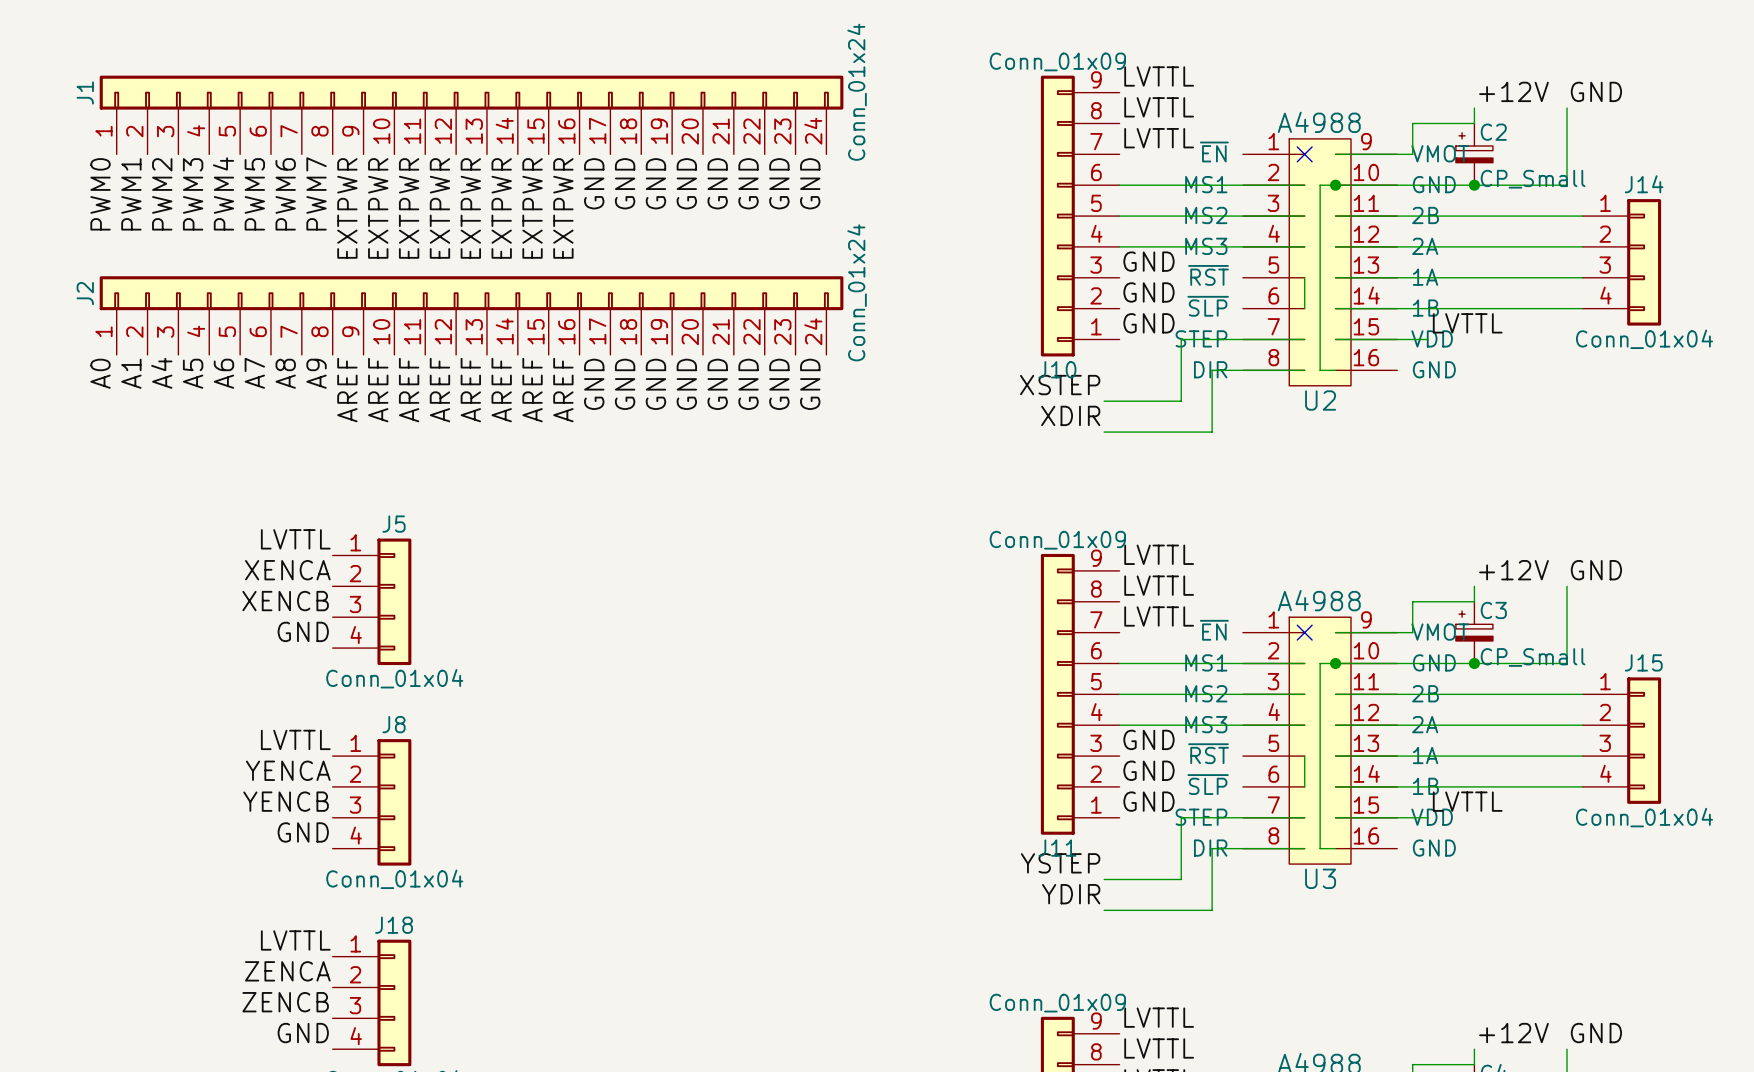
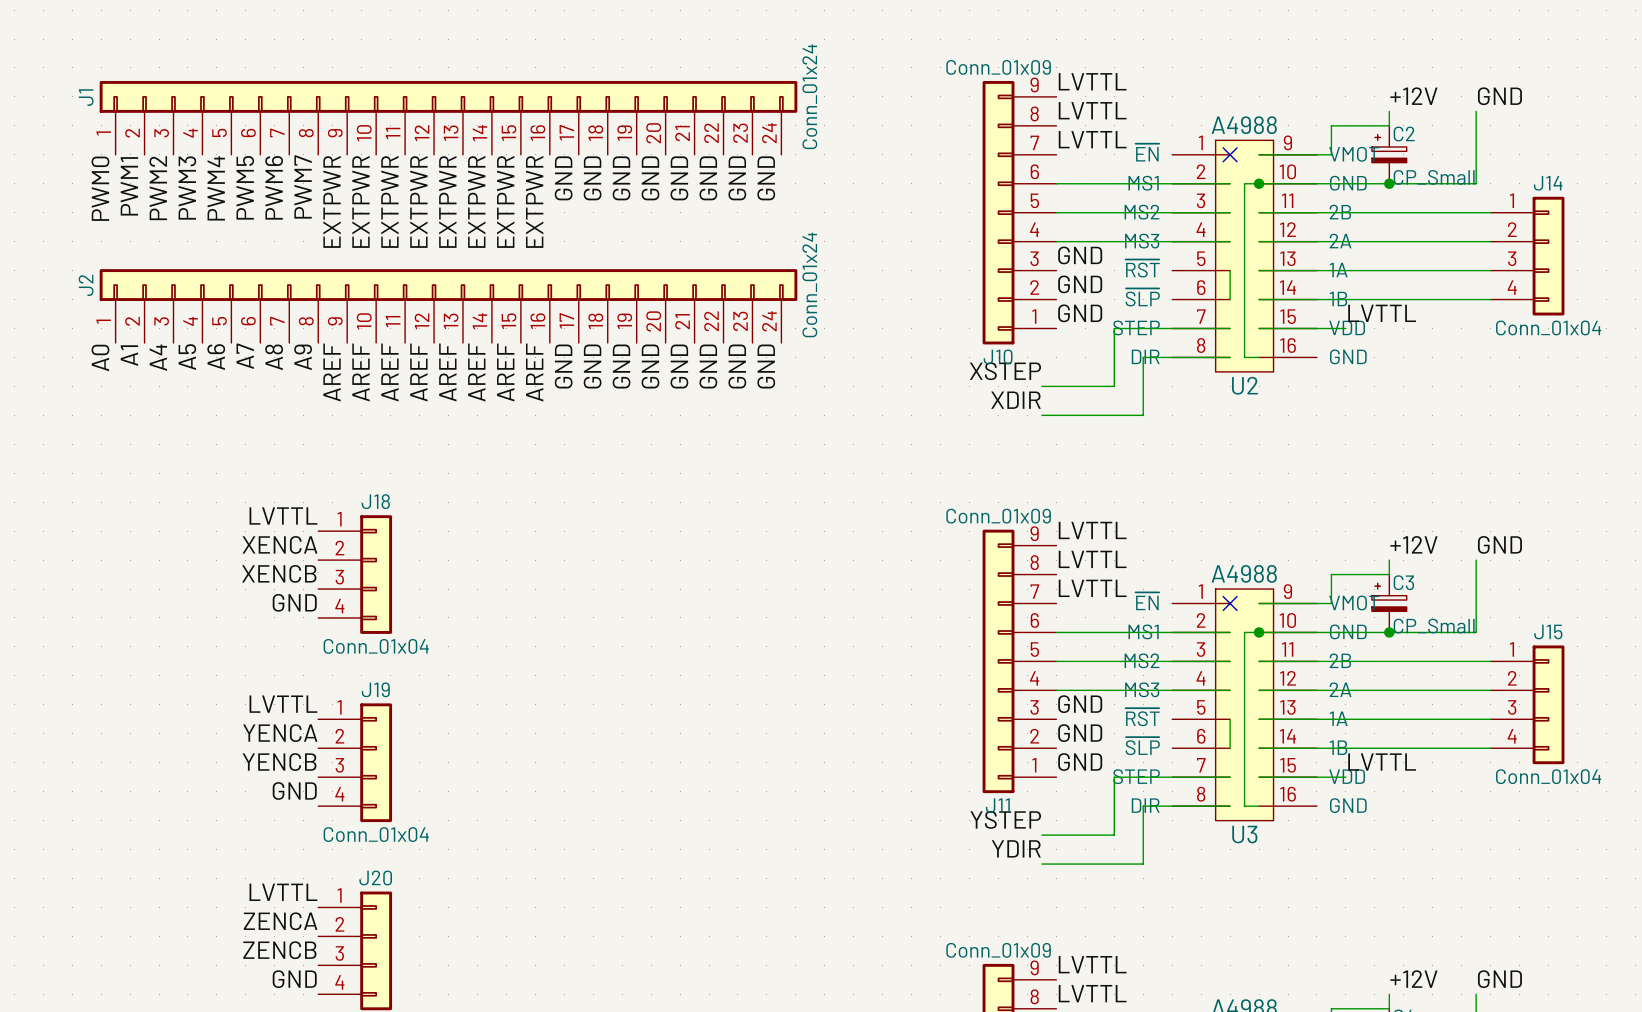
J5 name: J5 (394, 524) -> J18 (375, 501)
J8 name: J8 (394, 724) -> J19 (375, 689)
J18 name: J18 (394, 925) -> J20 (375, 877)

